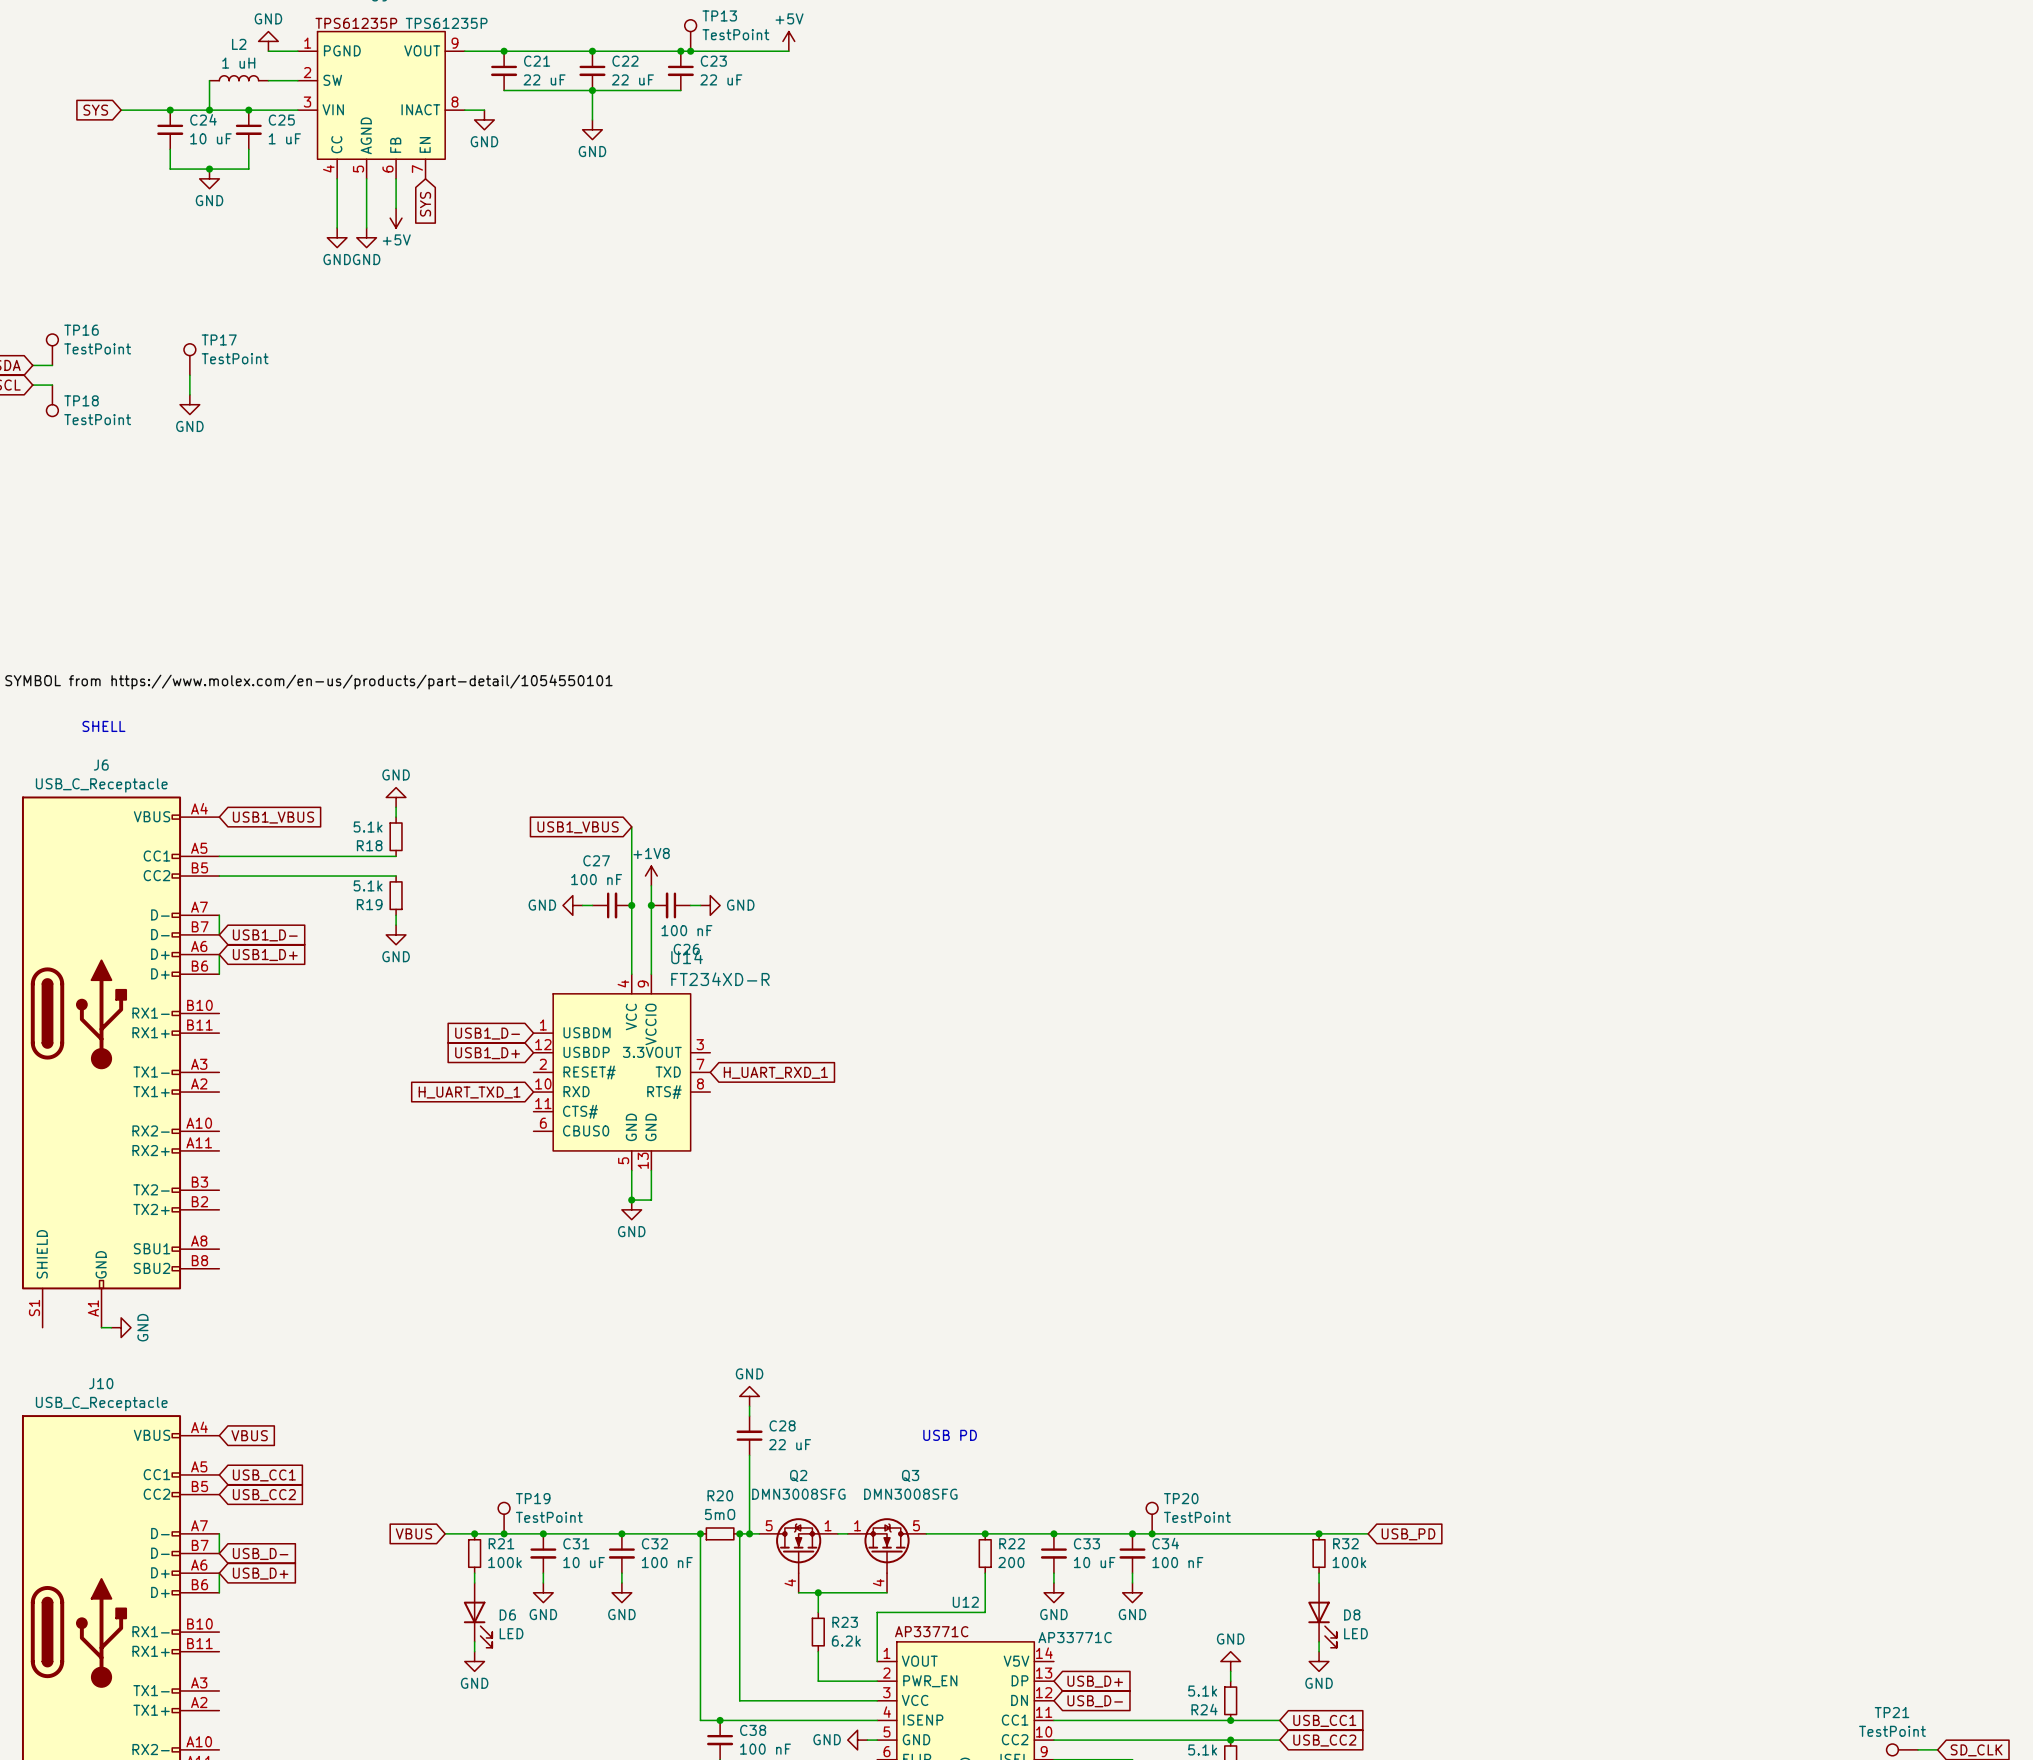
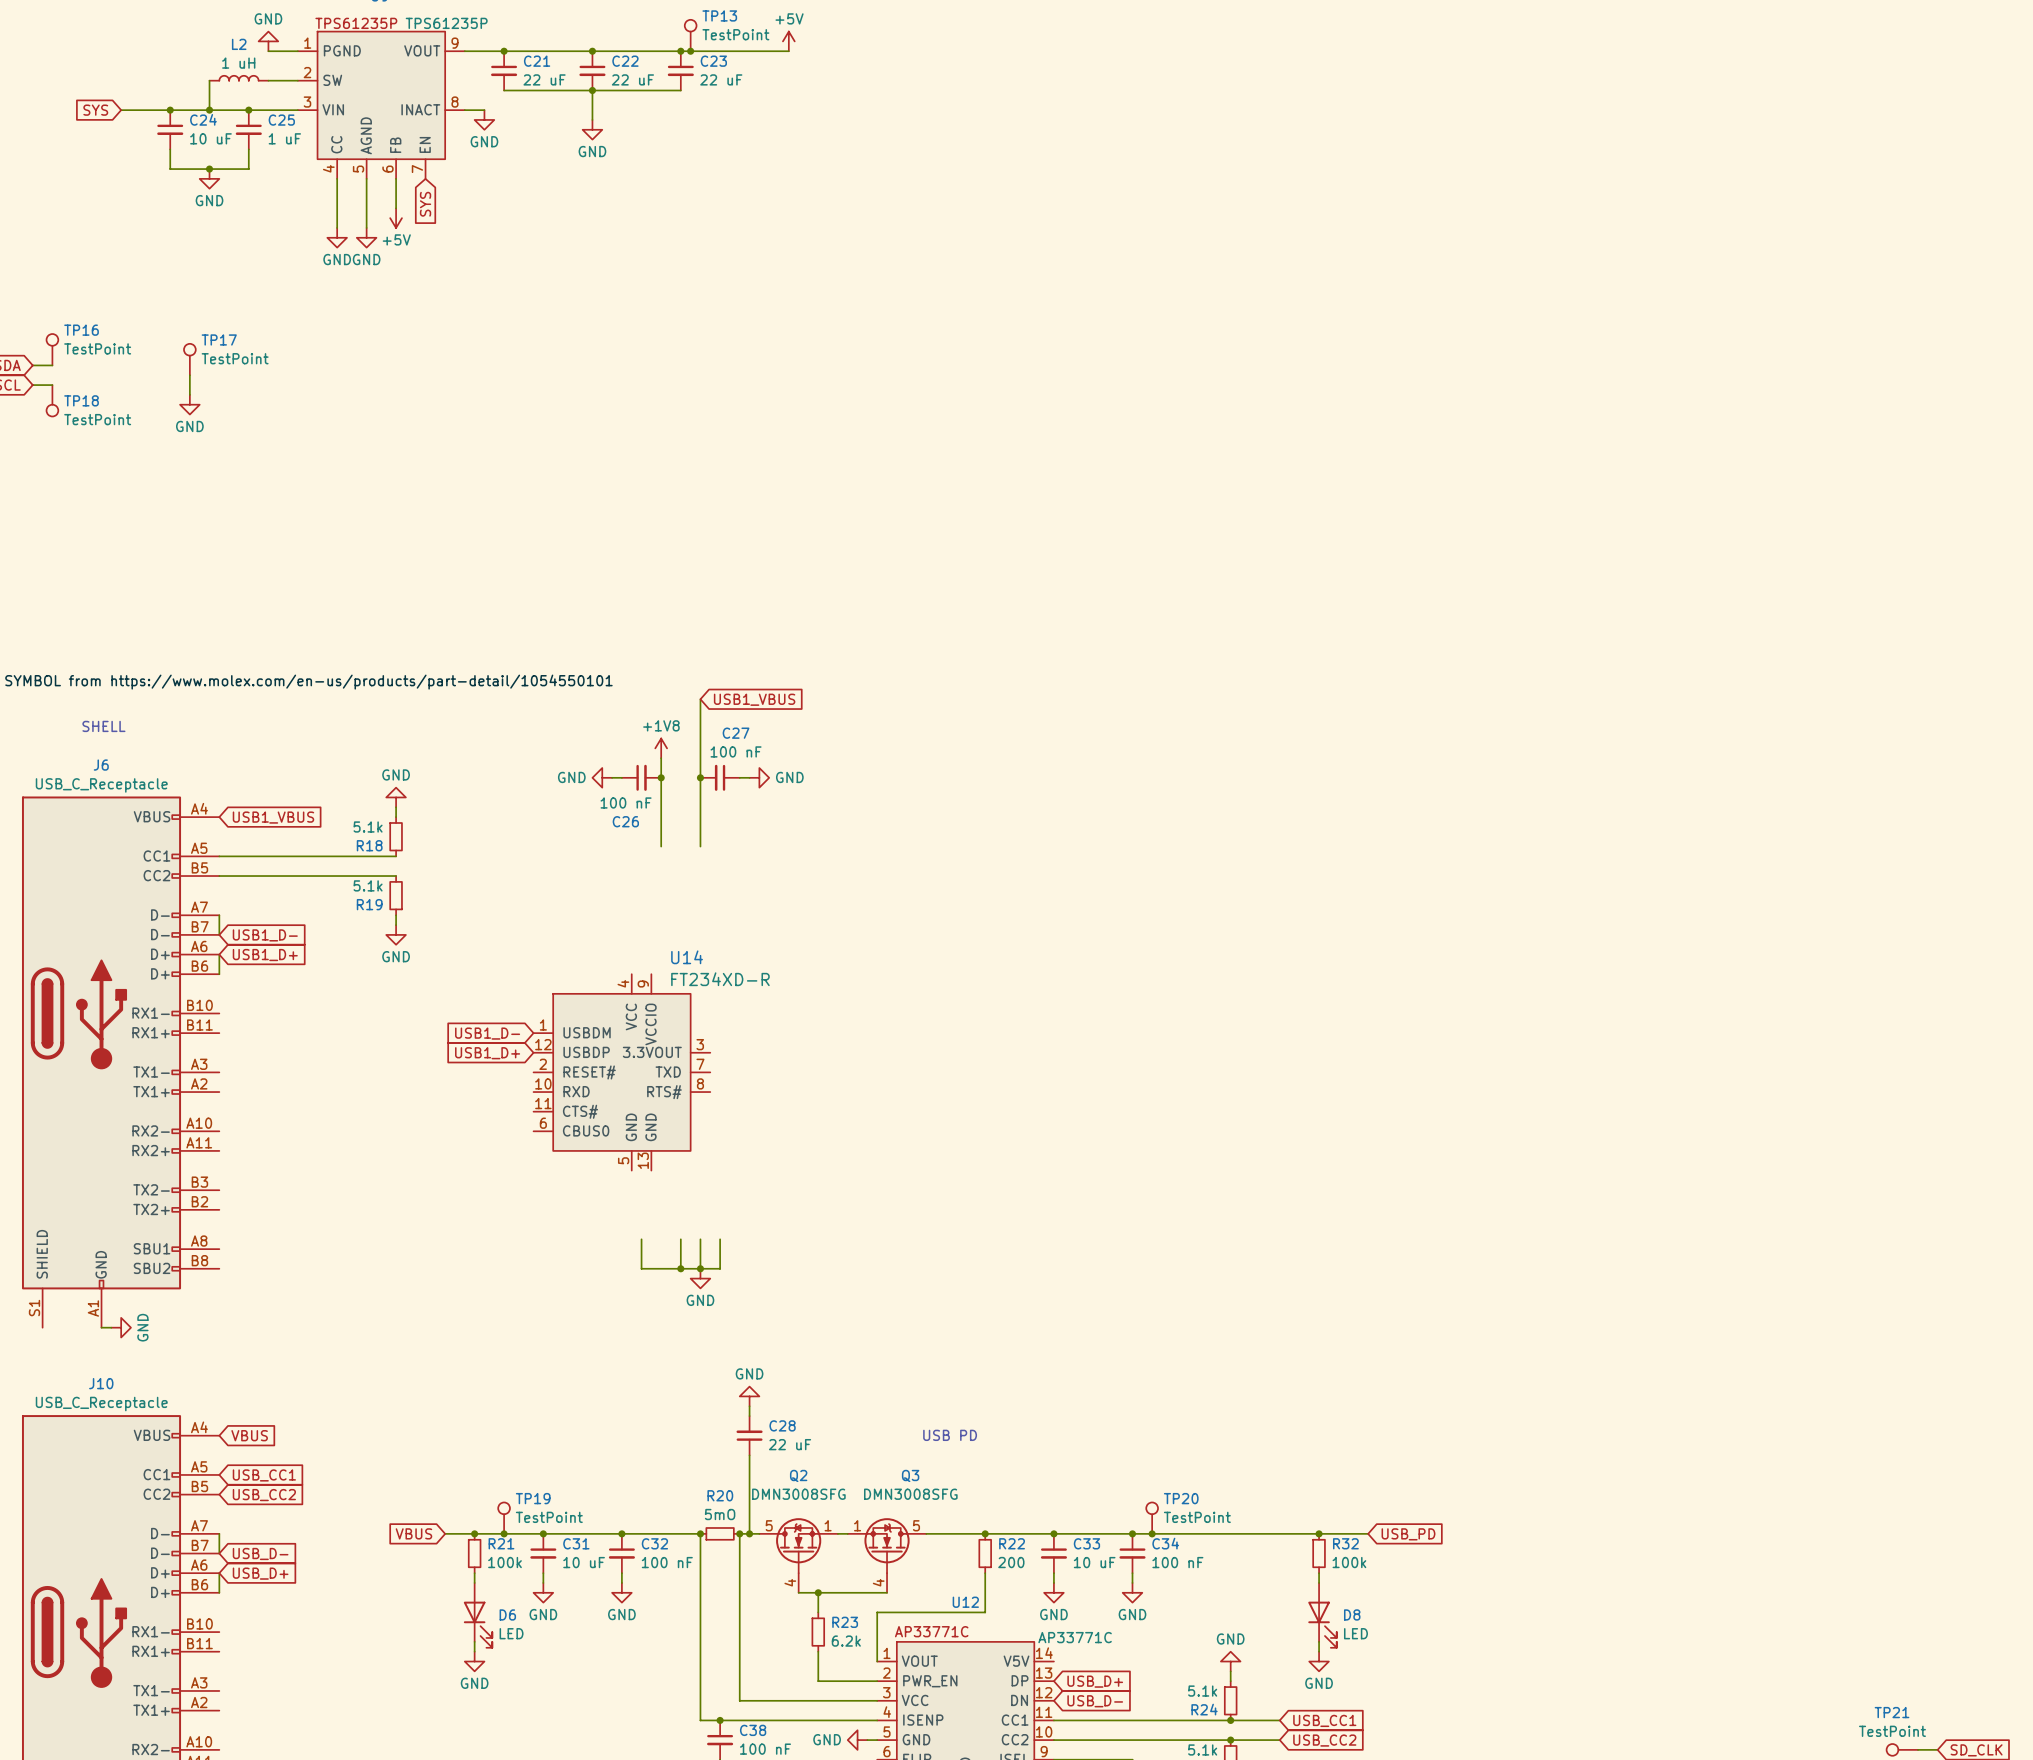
power symbol: none -> GND (602, 777)
junction: none -> (661, 777)
junction: none -> (700, 777)
power symbol: none -> GND (759, 777)
wire: (631, 826) (631, 974) -> (700, 699) (700, 846)
global label rotation: 0° (578, 827) -> 180° (754, 699)
global label position: USB1_VBUS (578, 827) -> USB1_VBUS (754, 699)
C27 name position: C27 (596, 860) -> C27 (736, 733)
power symbol position: +1V8 (651, 876) -> +1V8 (661, 748)
C27 value position: 100 nF (596, 879) -> 100 nF (736, 751)
wire: (651, 885) (651, 974) -> (661, 758) (661, 846)
power symbol: GND (572, 905) -> none
wire: (582, 905) (592, 905) -> (612, 777) (621, 777)
C27 rotation: 0° (612, 905) -> 180° (720, 777)
C27 position: (612, 905) -> (720, 777)
junction: (631, 905) -> none
junction: (651, 905) -> none
C26 rotation: 0° (670, 905) -> 180° (641, 777)
C26 position: (671, 905) -> (641, 777)
wire: (690, 905) (700, 905) -> (739, 777) (749, 777)
power symbol: GND (710, 905) -> none
C26 value position: 100 nF (686, 930) -> 100 nF (626, 802)
C26 name position: C26 (686, 949) -> C26 (625, 821)
global label: H_UART_RXD_1 (775, 1072) -> none
global label: H_UART_TXD_1 (469, 1092) -> none
wire: (631, 1170) (631, 1200) (651, 1200) (651, 1170) -> none
junction: (631, 1200) -> none
power symbol position: GND (631, 1209) -> GND (700, 1278)
wire: none -> (641, 1239) (641, 1268) (720, 1268) (720, 1239)
wire: none -> (680, 1239) (680, 1268)
wire: none -> (700, 1239) (700, 1268)
junction: none -> (680, 1268)
junction: none -> (700, 1268)

